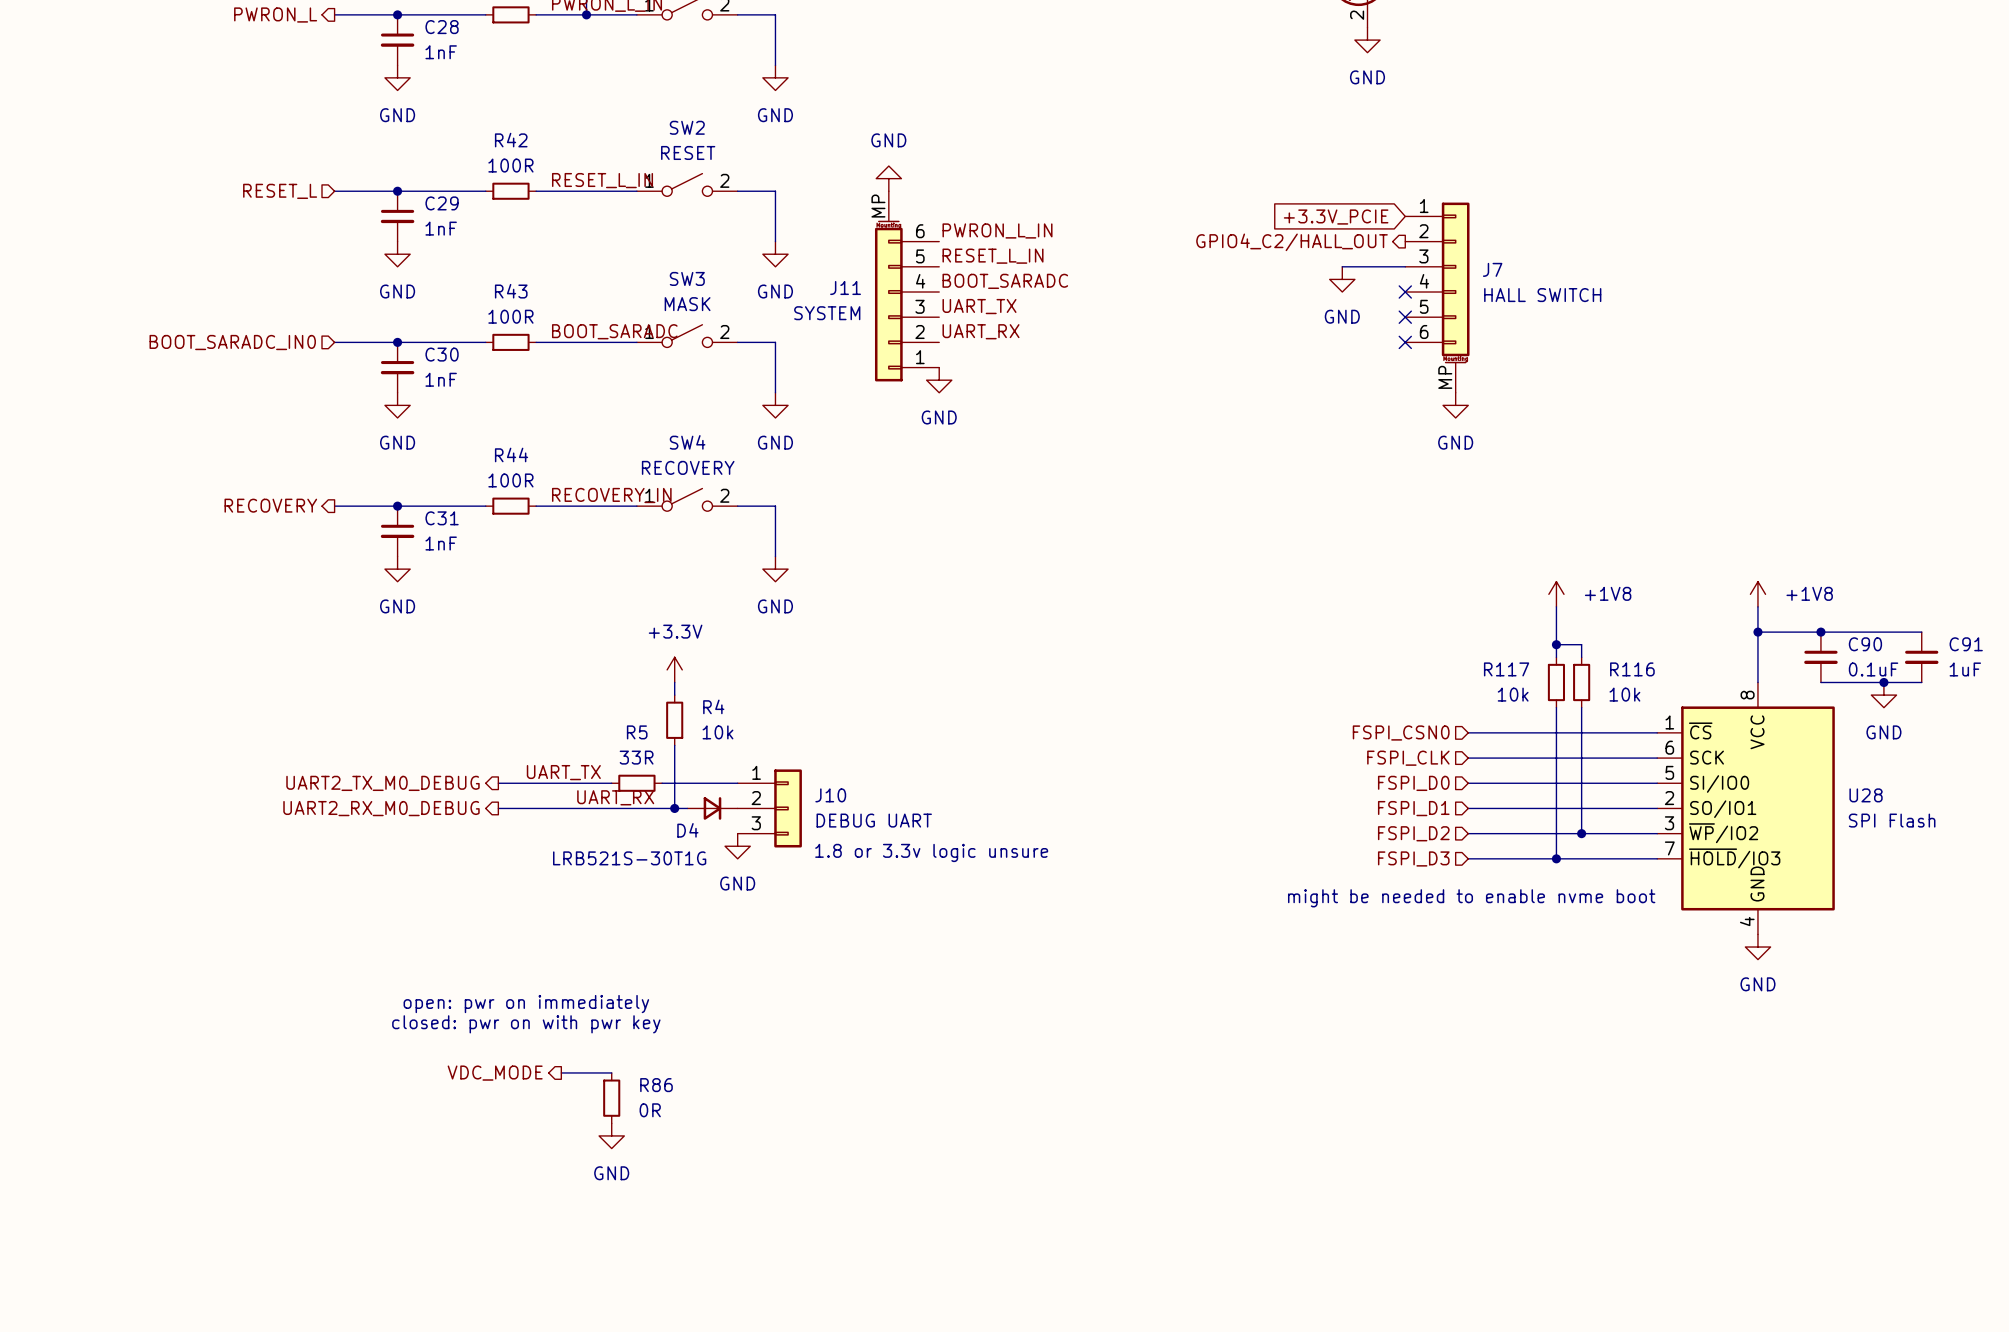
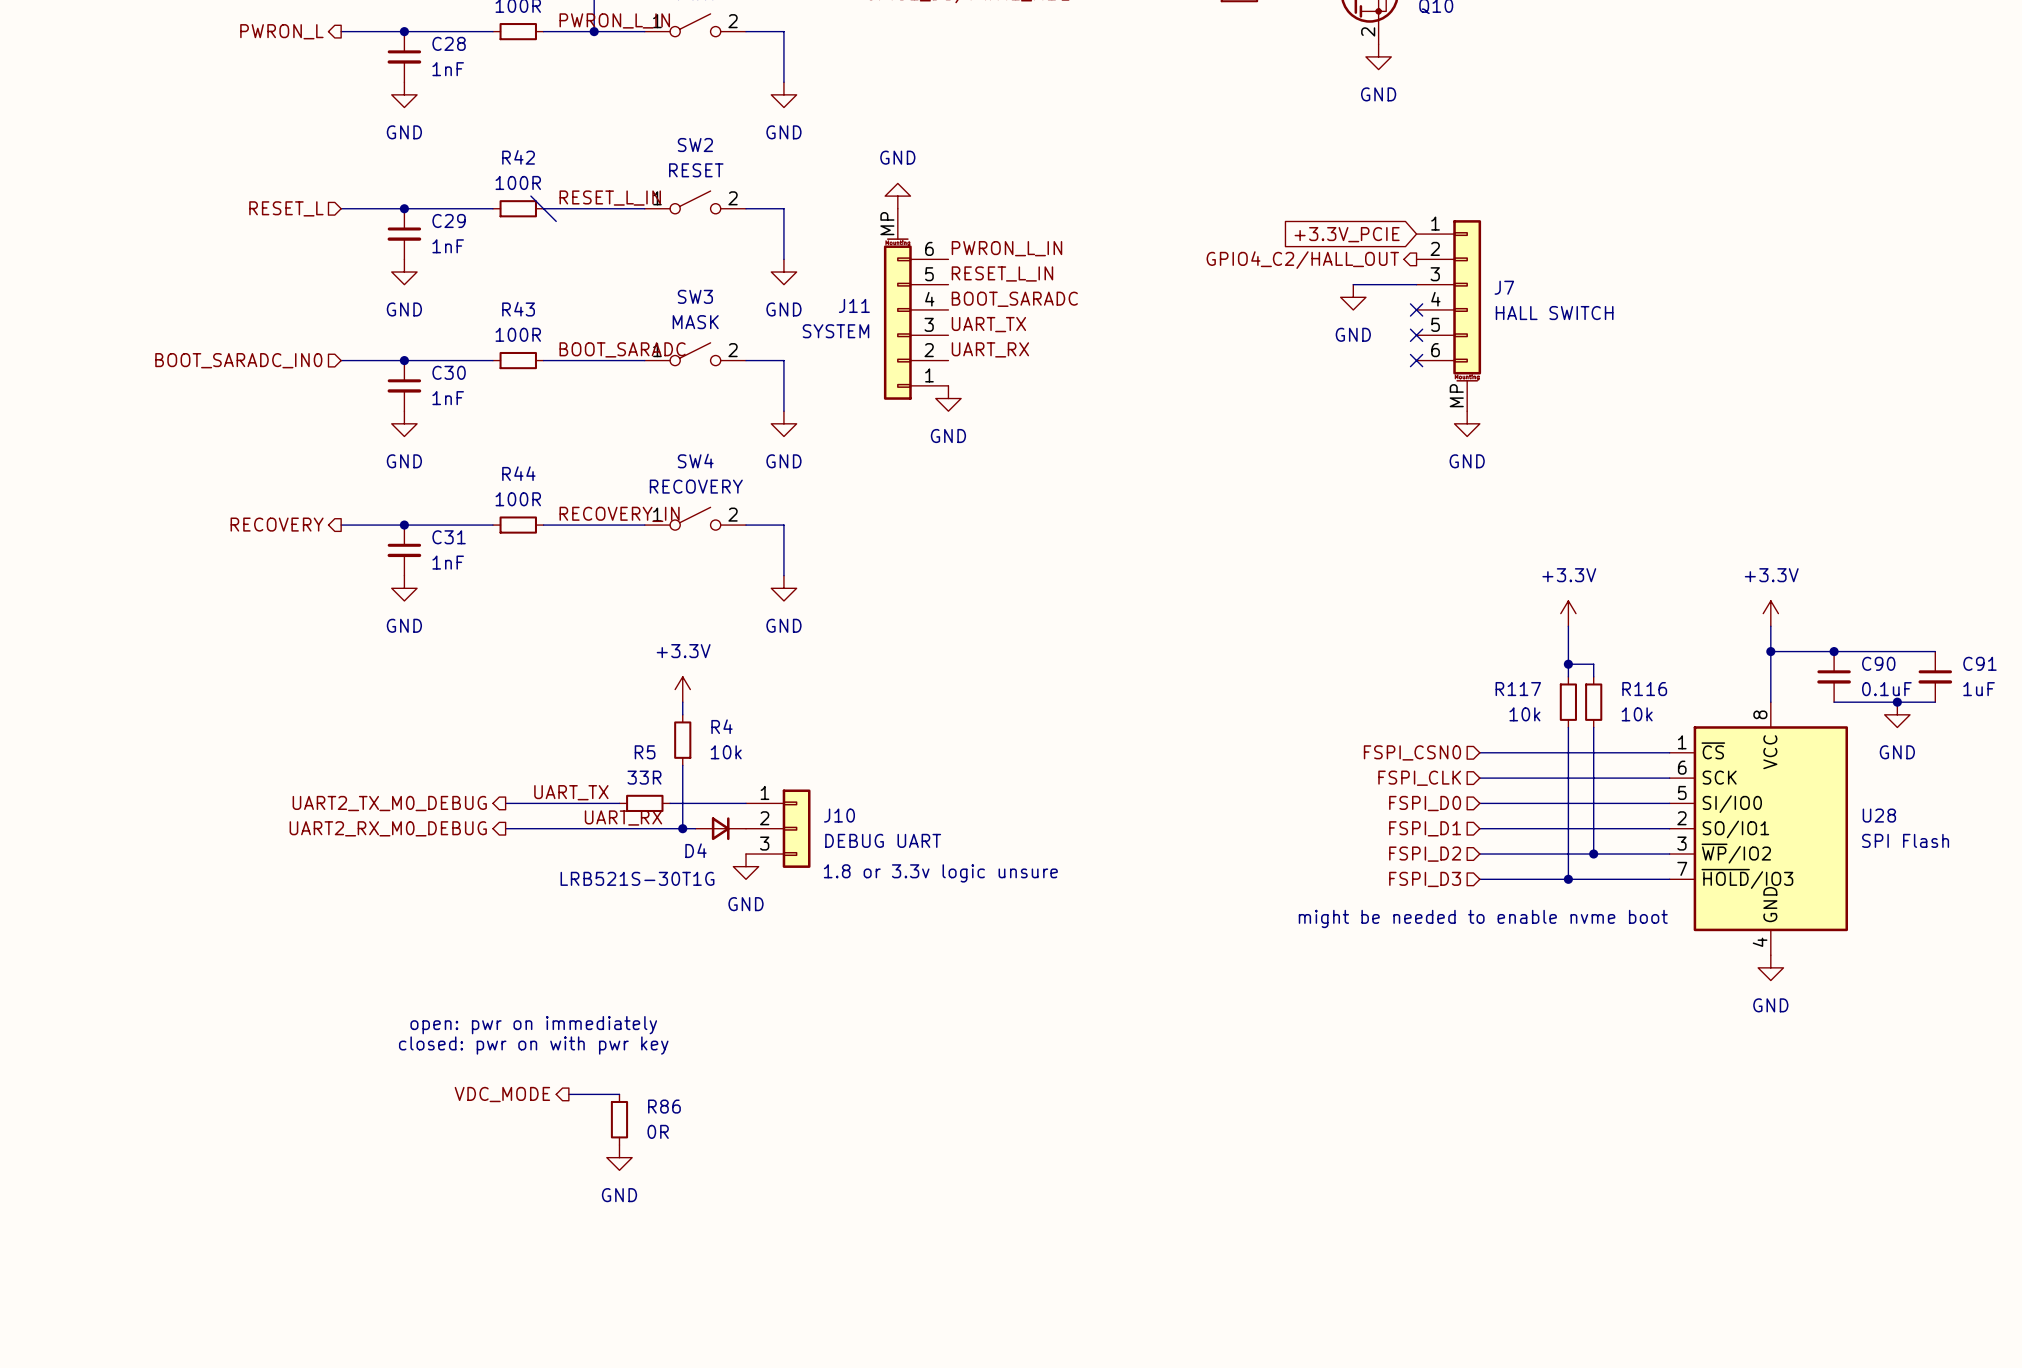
wire: none -> (530, 196) (556, 221)
power symbol: +1V8 (1556, 594) -> +3.3V (1568, 613)
power symbol: +1V8 (1757, 594) -> +3.3V (1770, 613)

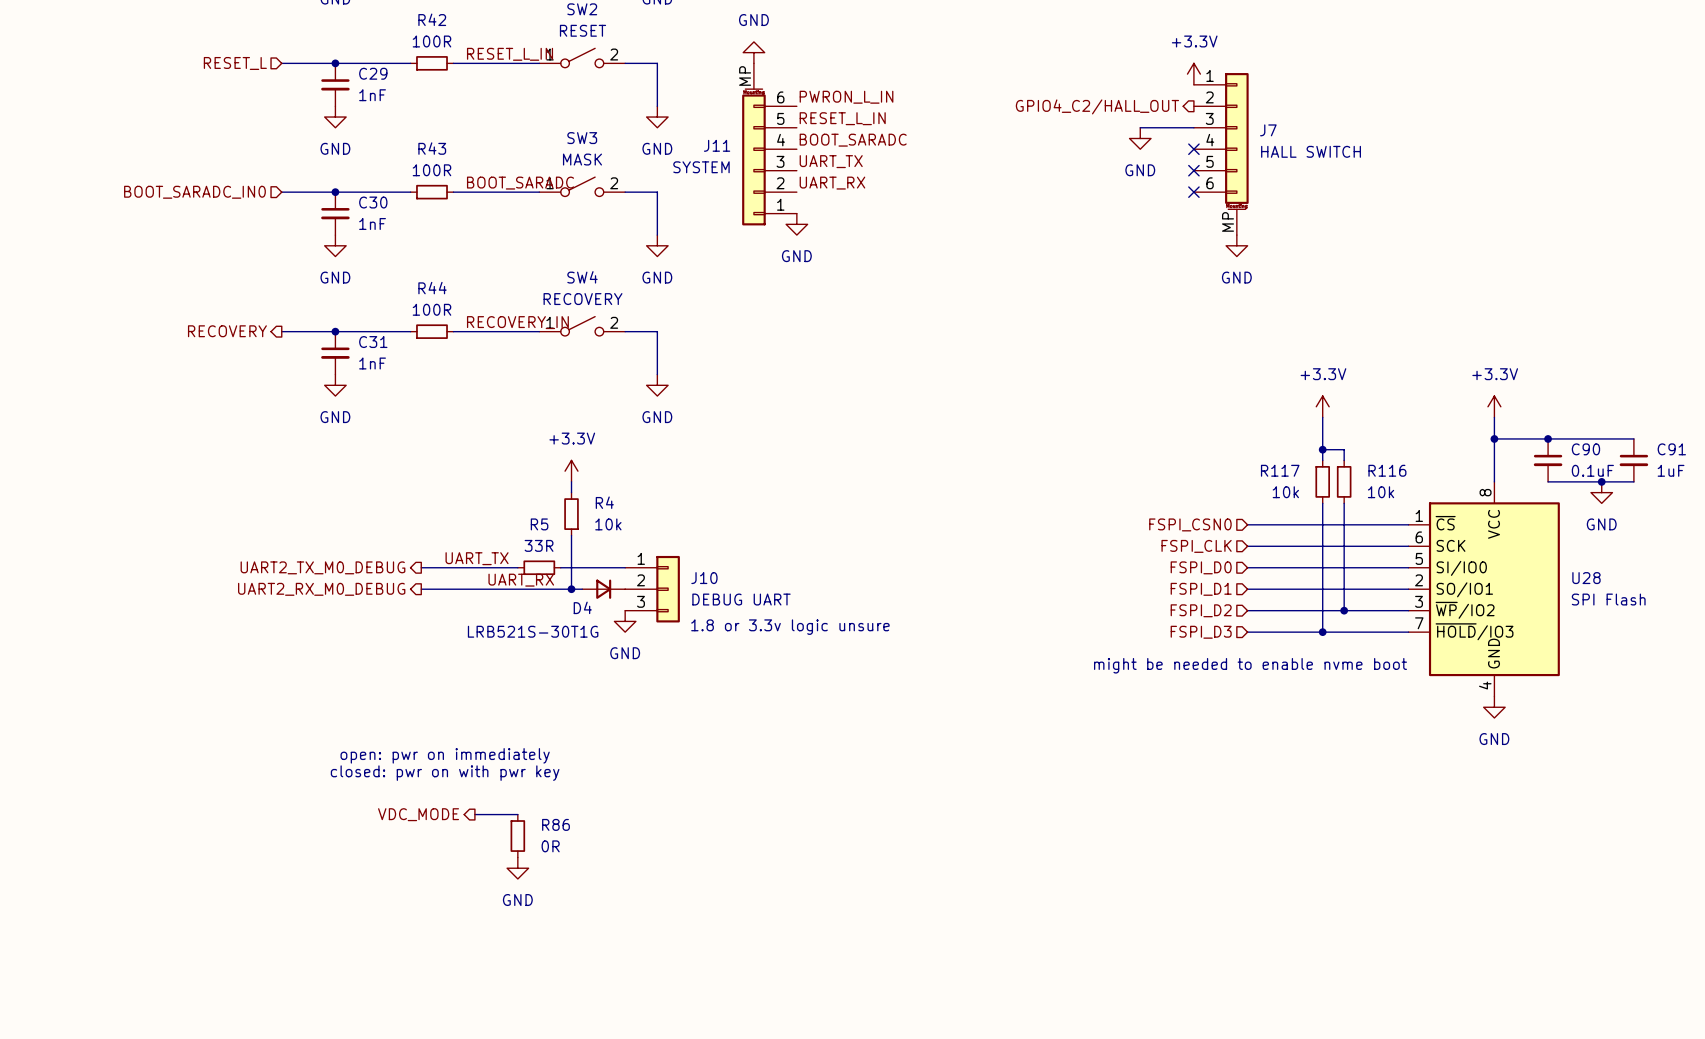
wire: (530, 196) (556, 221) -> none
power symbol: none -> +3.3V (1193, 74)
global label: +3.3V_PCIE (1347, 234) -> none

